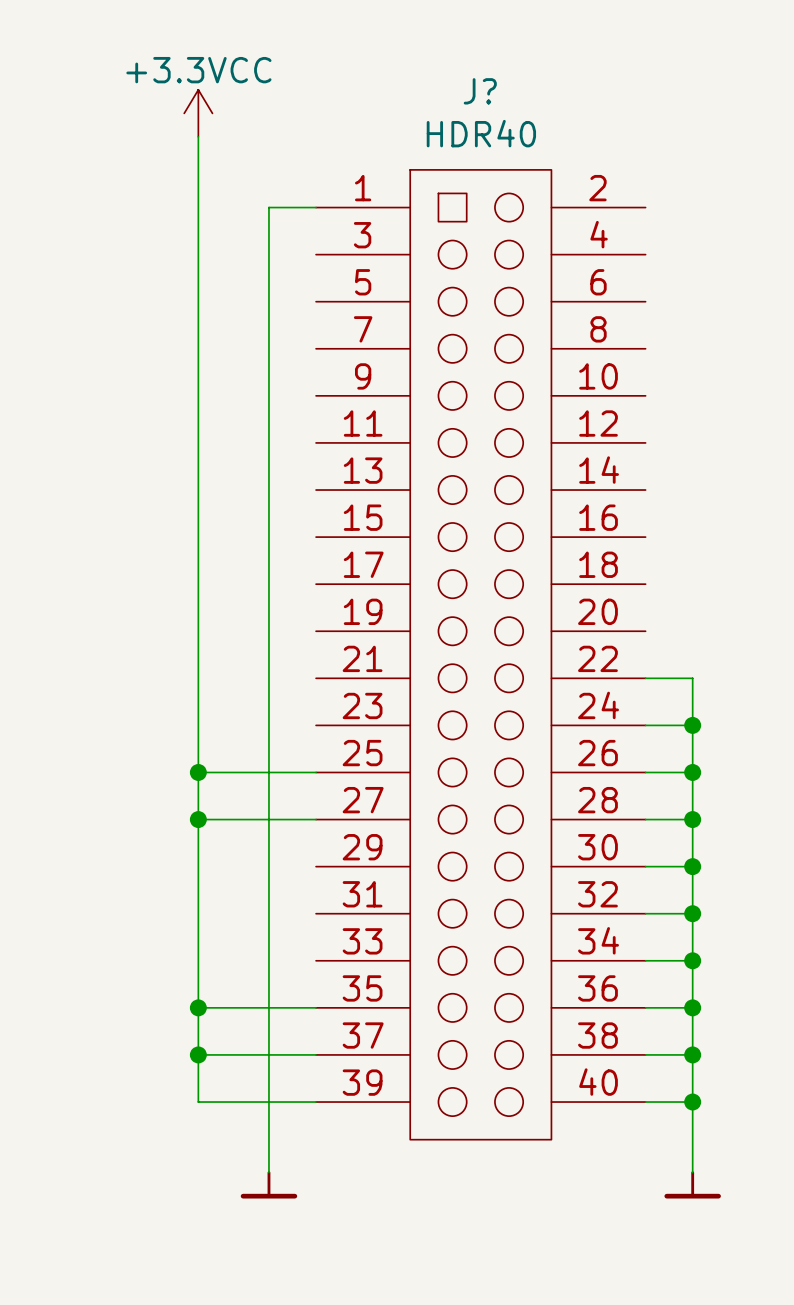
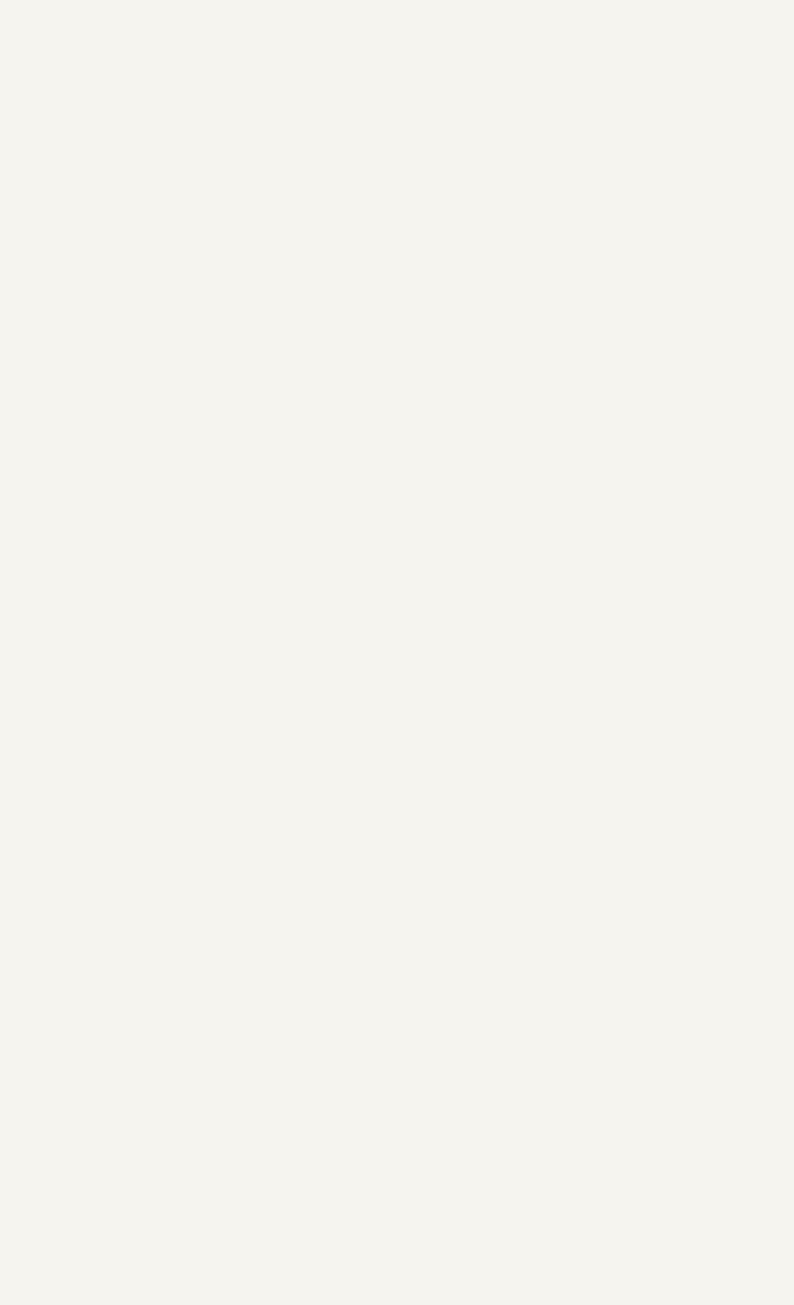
power symbol: +3.3VCC (198, 113) -> none
wire: (198, 136) (198, 1102) (316, 1102) -> none
wire: (316, 207) (268, 207) (268, 1172) -> none
J?: HDR40 (480, 654) -> none
wire: (645, 678) (692, 678) (692, 1172) -> none
wire: (645, 725) (692, 725) -> none
junction: (692, 725) -> none
wire: (198, 772) (316, 772) -> none
junction: (198, 772) -> none
wire: (645, 772) (692, 772) -> none
junction: (692, 772) -> none
wire: (198, 819) (316, 819) -> none
junction: (198, 819) -> none
wire: (645, 819) (692, 819) -> none
junction: (692, 819) -> none
wire: (645, 866) (692, 866) -> none
junction: (692, 866) -> none
wire: (645, 913) (692, 913) -> none
junction: (692, 913) -> none
wire: (645, 960) (692, 960) -> none
junction: (692, 960) -> none
wire: (198, 1007) (316, 1007) -> none
junction: (198, 1007) -> none
wire: (645, 1007) (692, 1007) -> none
junction: (692, 1007) -> none
wire: (198, 1054) (316, 1054) -> none
junction: (198, 1054) -> none
wire: (645, 1054) (692, 1054) -> none
junction: (692, 1054) -> none
wire: (645, 1102) (692, 1102) -> none
junction: (692, 1102) -> none
power symbol: (268, 1184) -> none
power symbol: (692, 1184) -> none

